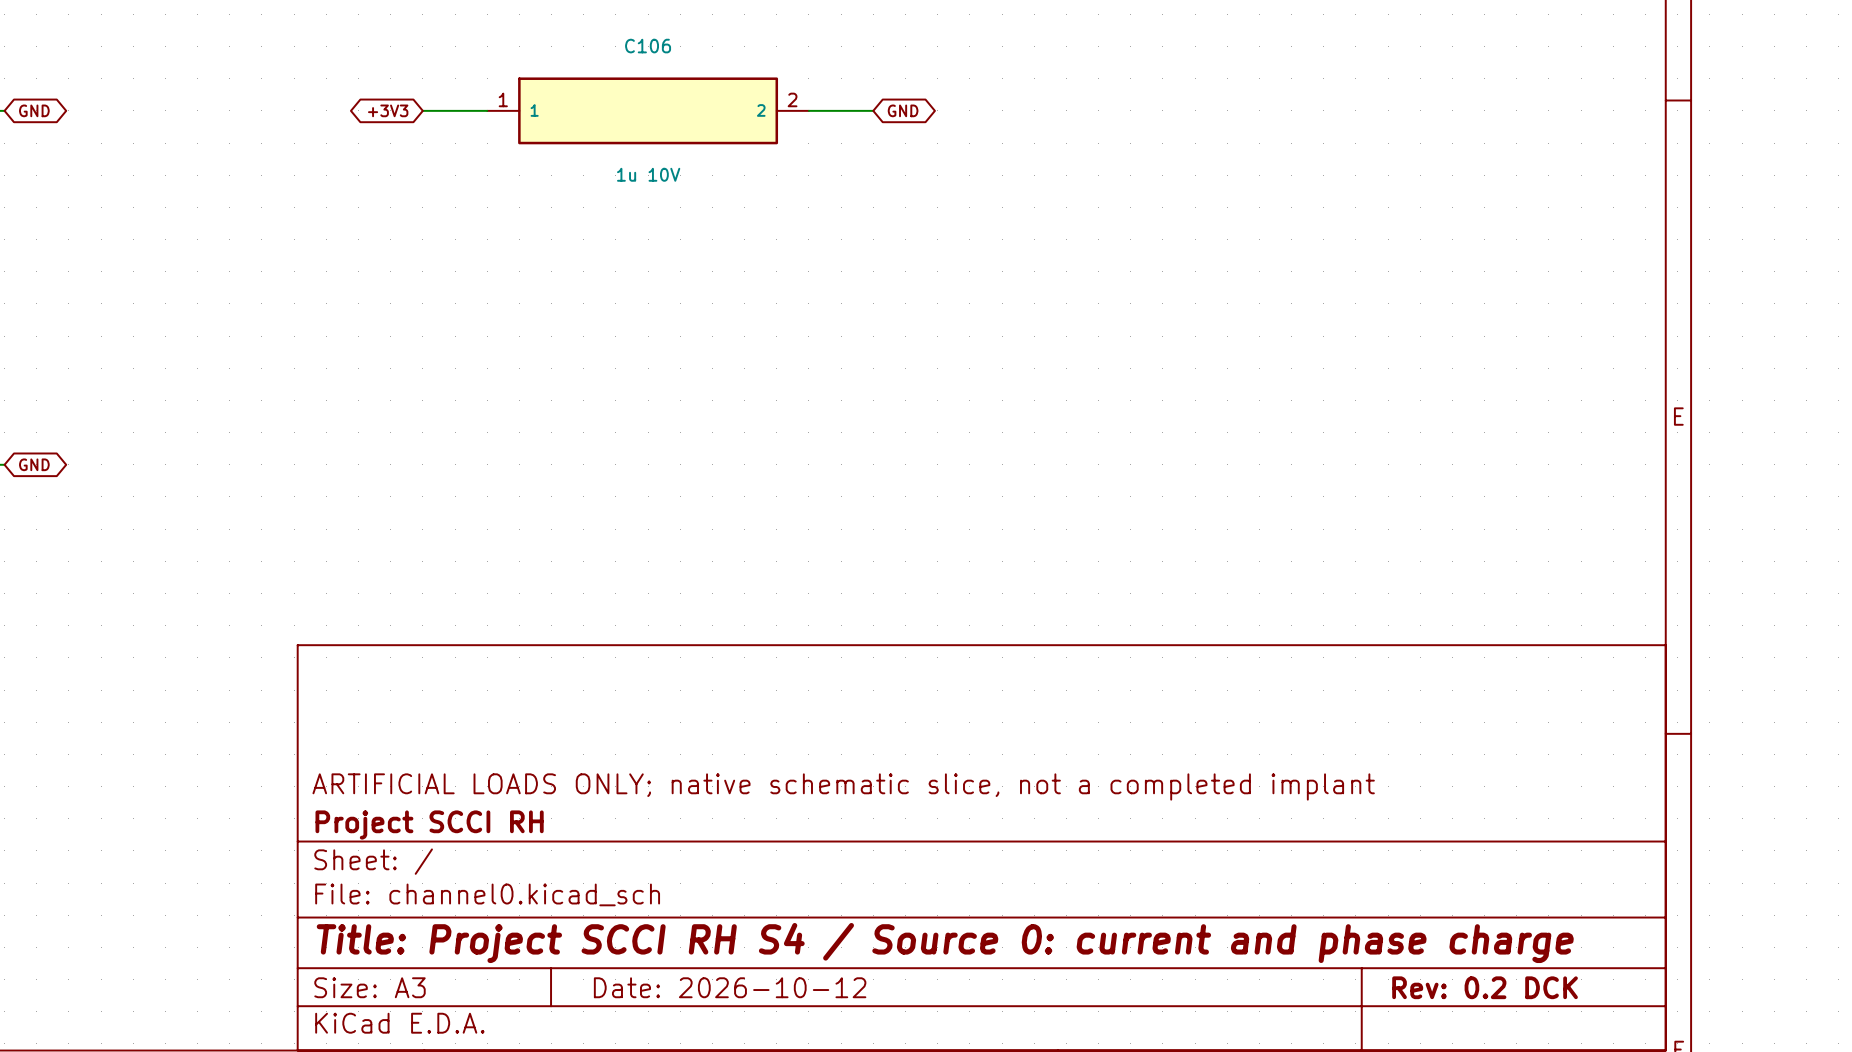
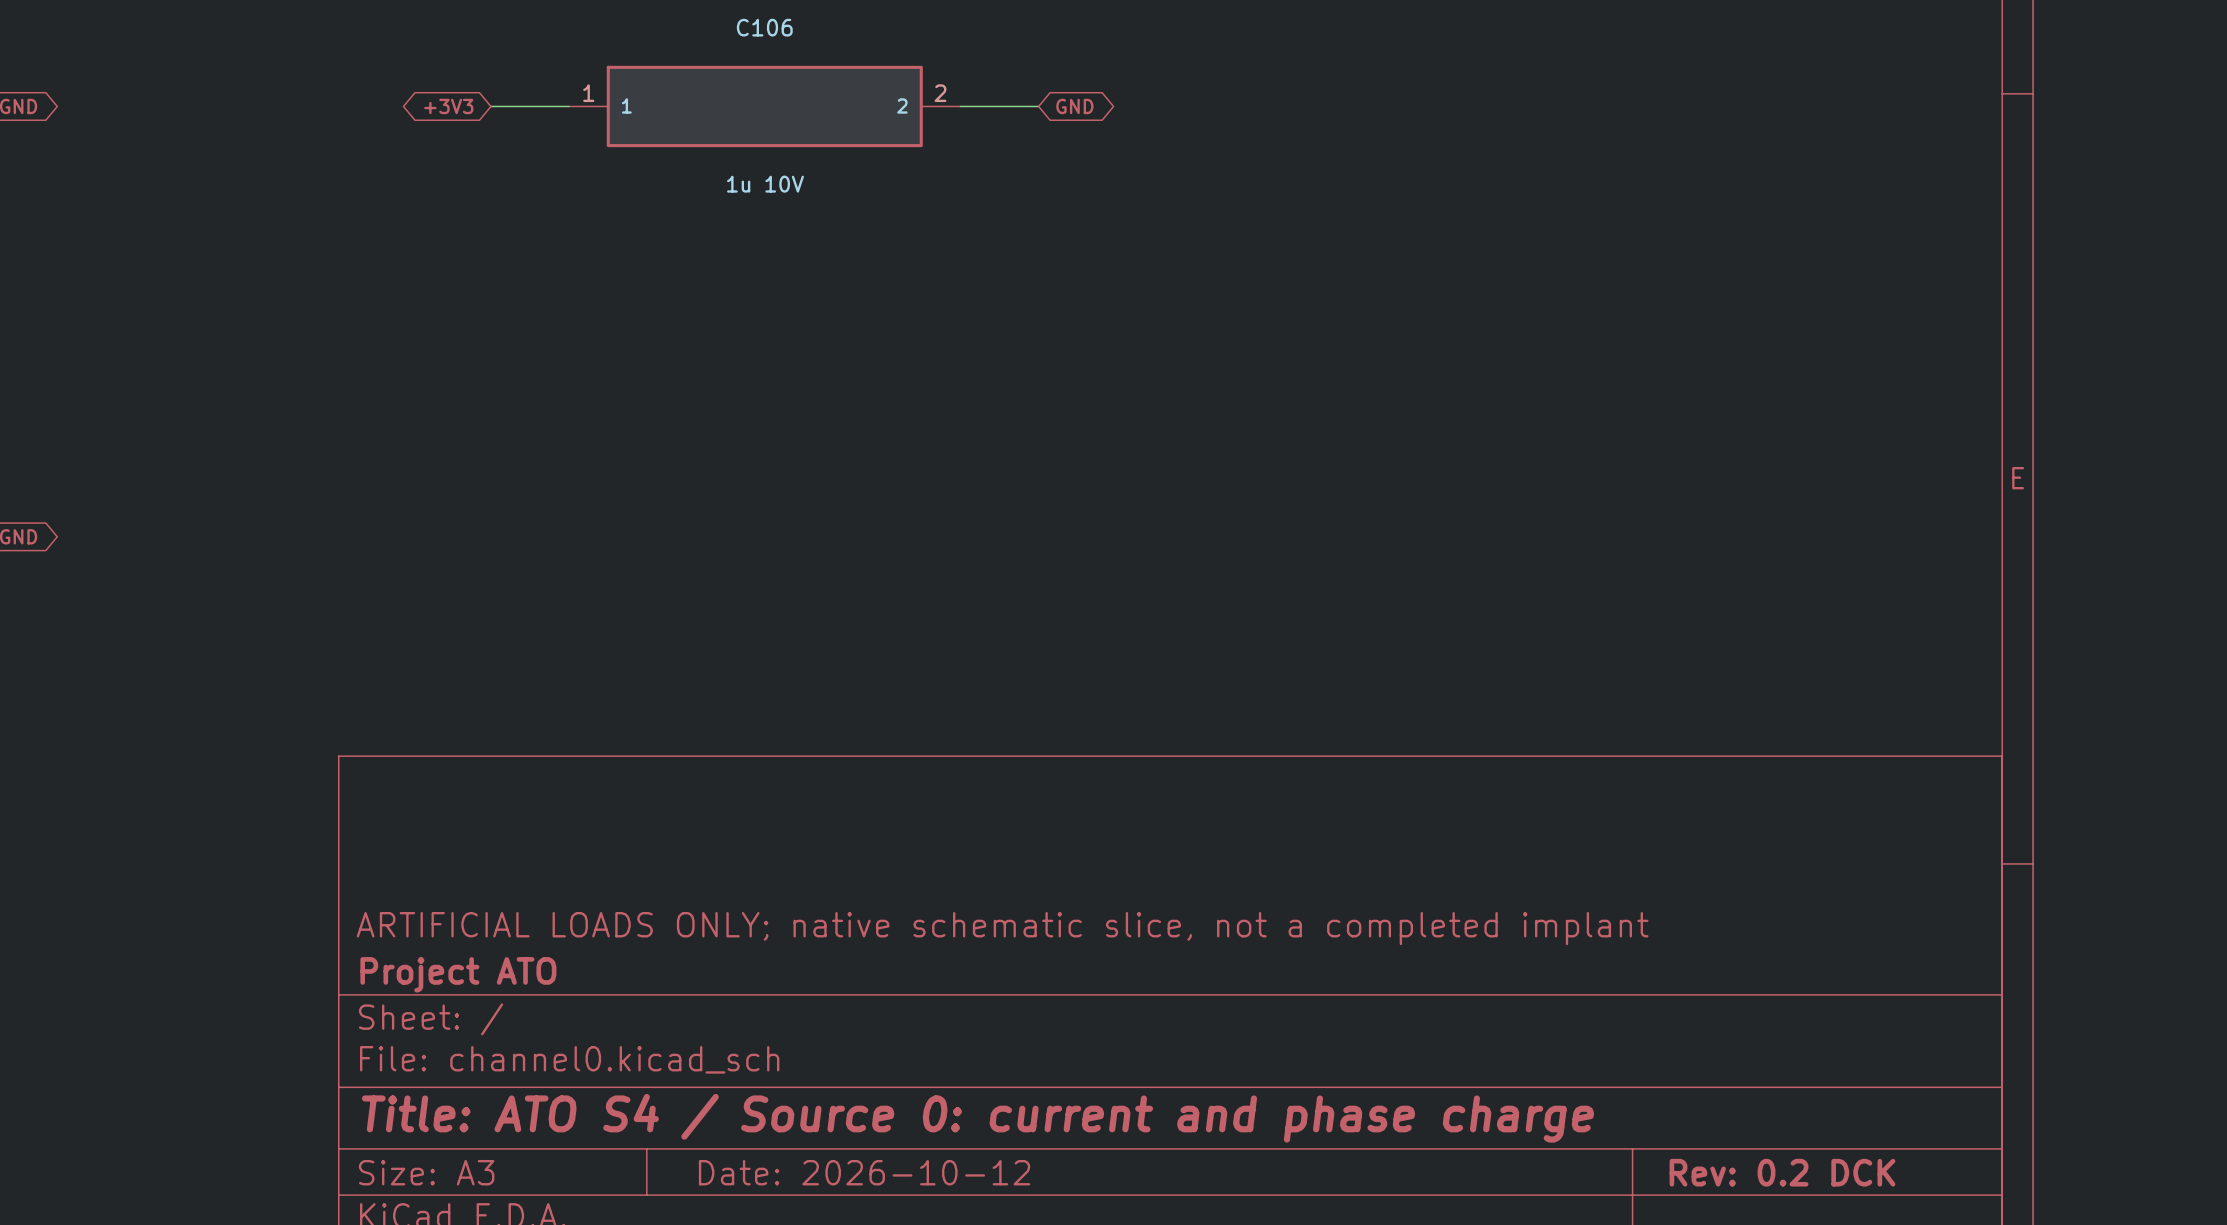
title block: Project SCCI RH (429, 824) -> Project ATO (458, 974)
title block: Title: Project SCCI RH S4 / Source 0: current and phase charge (945, 943) -> Title: ATO S4 / Source 0: current and phase charge (977, 1118)

